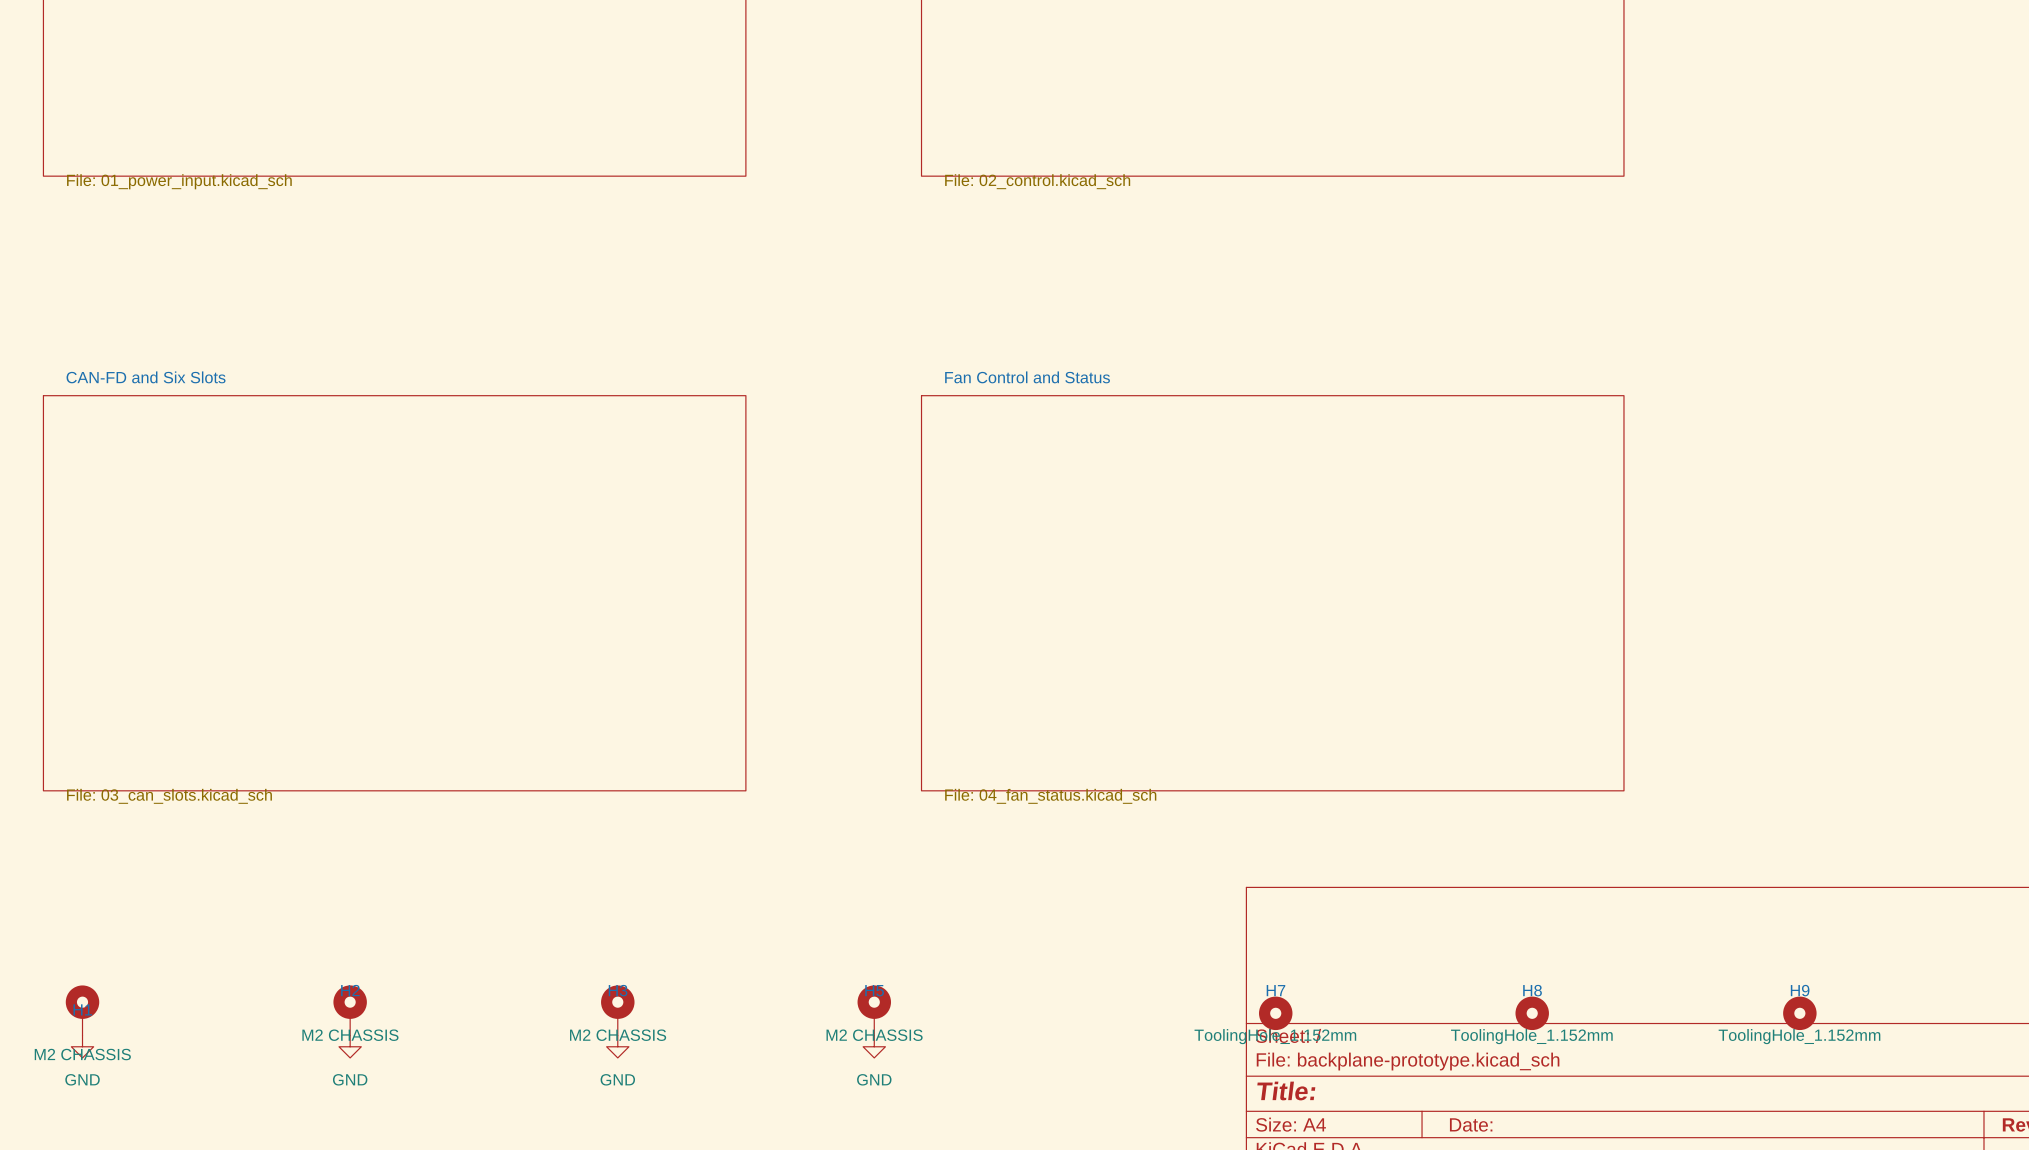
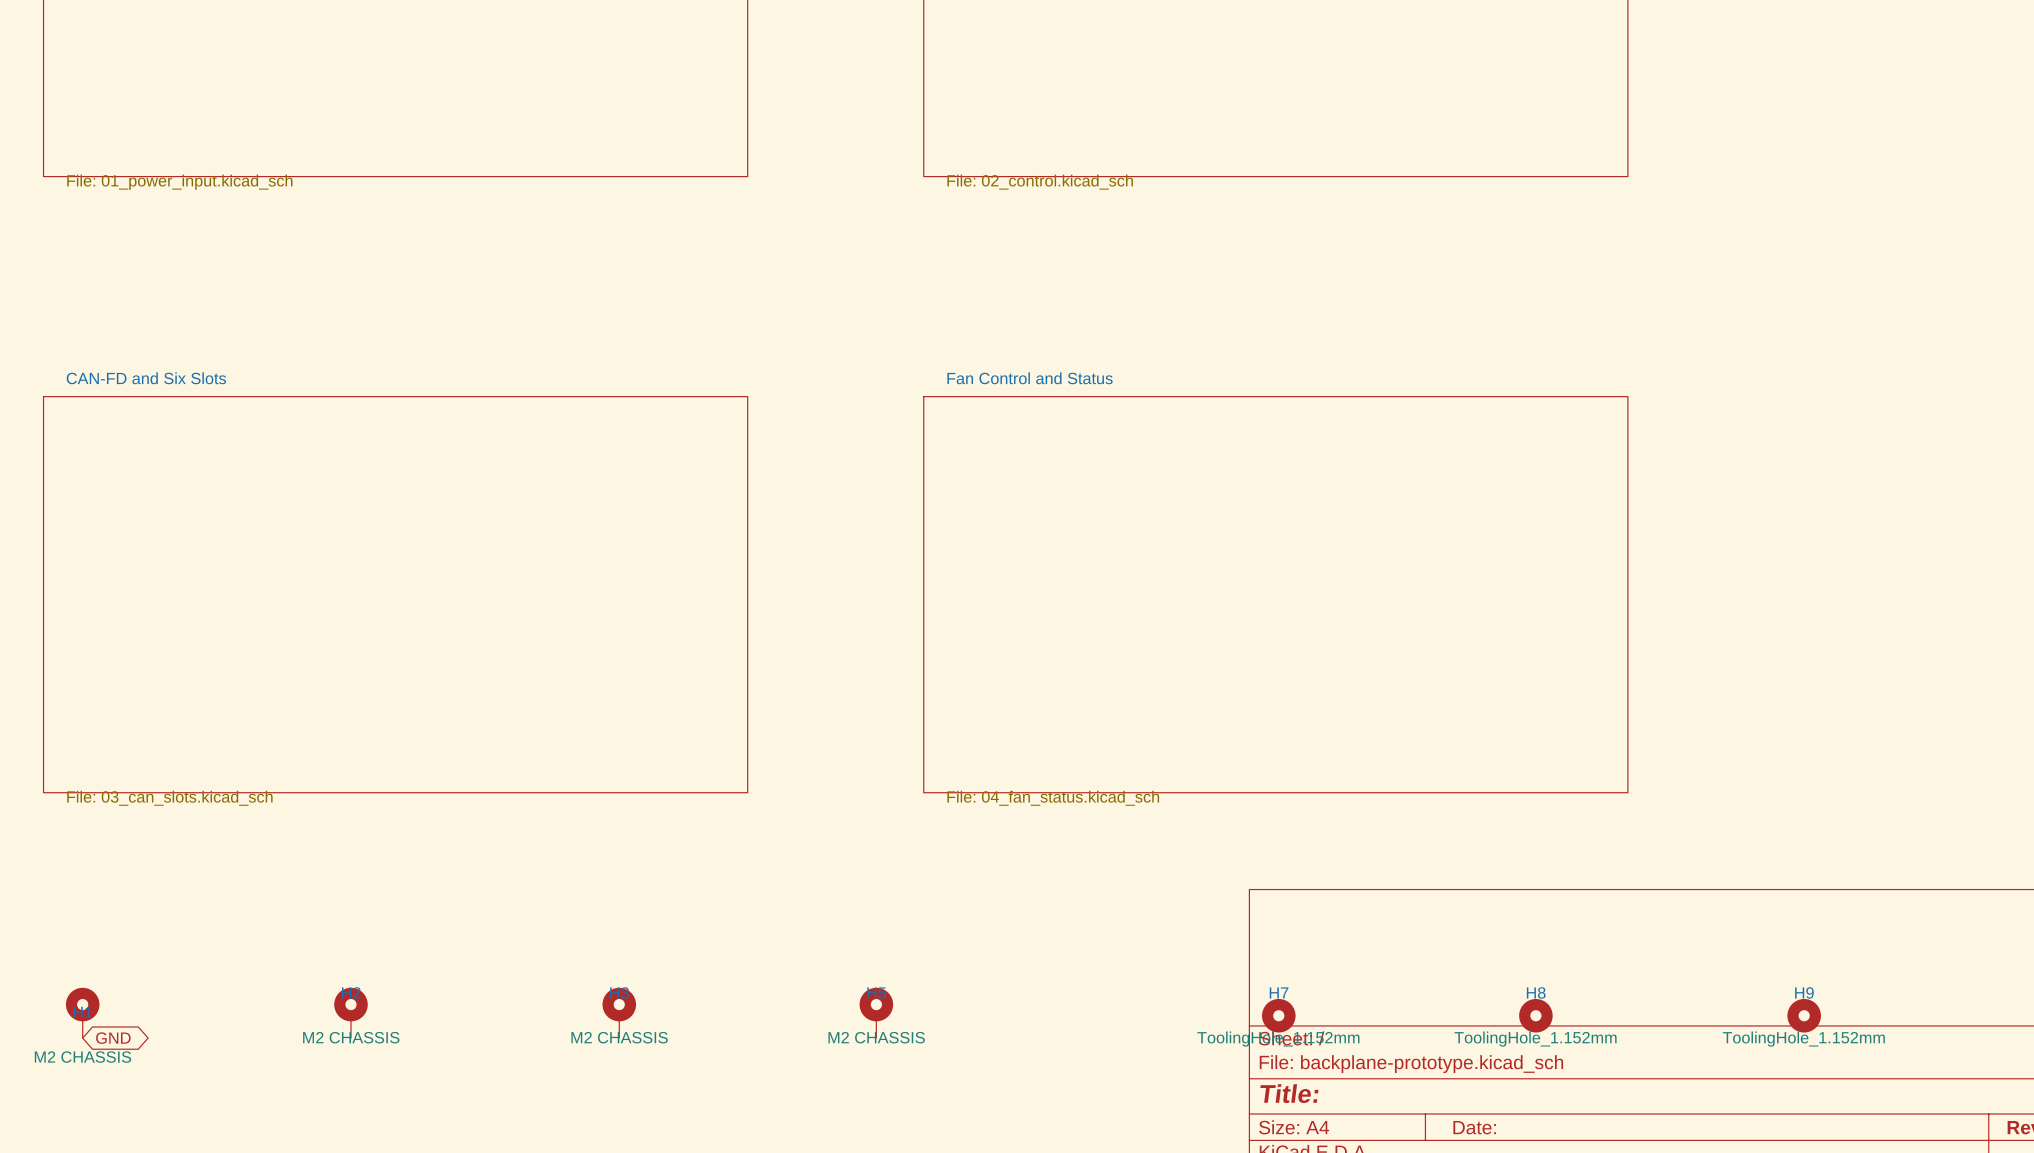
global label: none -> GND (113, 1038)
power symbol: GND (82, 1046) -> none
power symbol: GND (350, 1046) -> none
power symbol: GND (617, 1046) -> none
power symbol: GND (874, 1046) -> none

